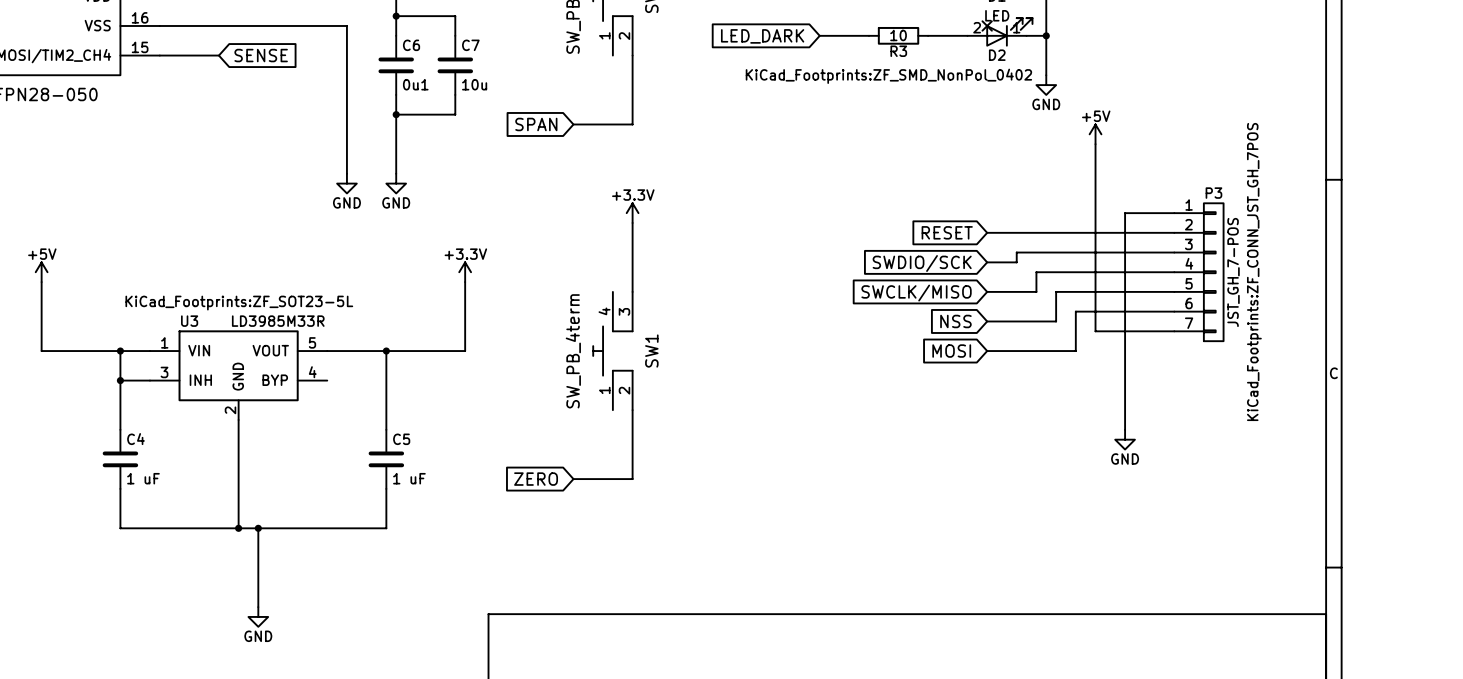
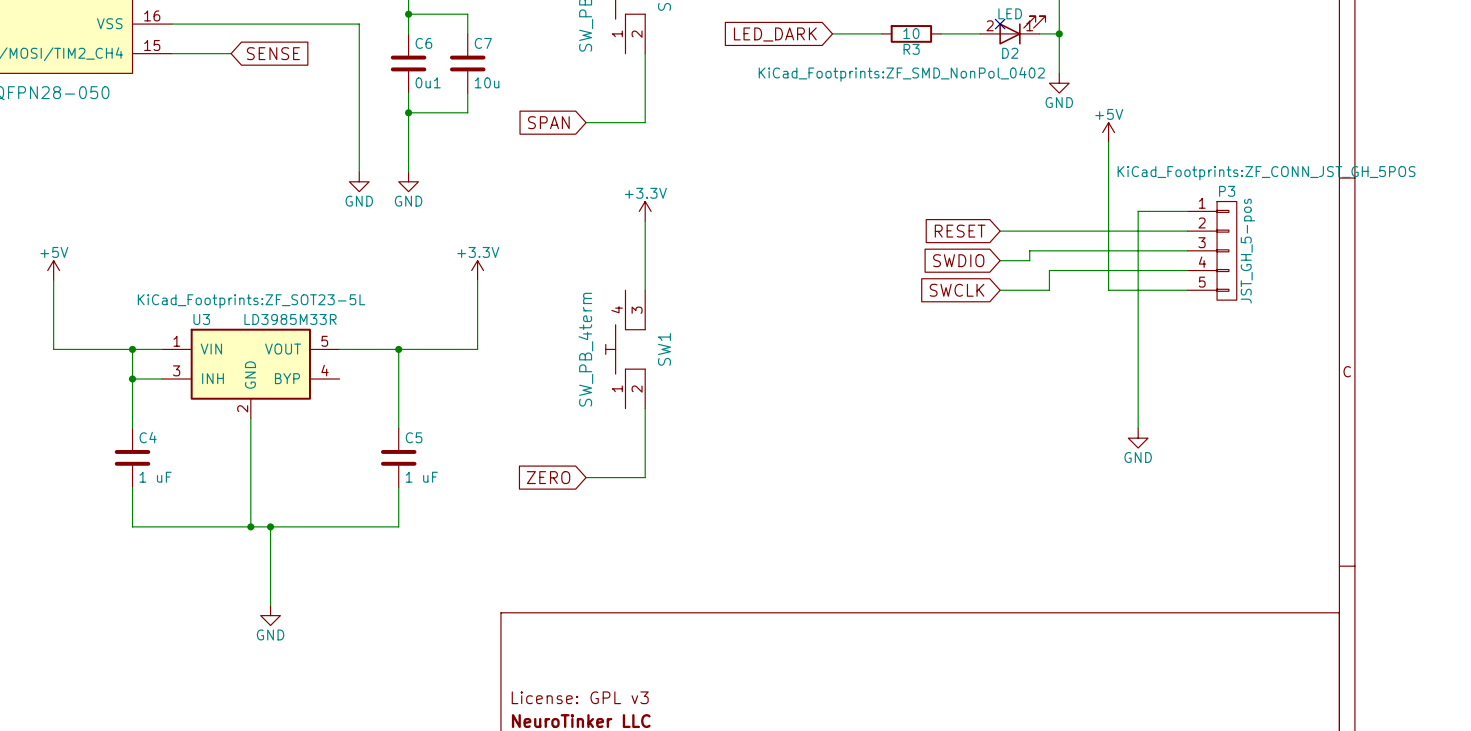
P3 symbol: [1174, 203, 1224, 342] -> [1187, 201, 1237, 301]
global label: SWDIO/SCK (922, 263) -> SWDIO (958, 260)
P3 value: JST_GH_7-POS (1233, 272) -> JST_GH_5-pos (1247, 251)
P3 text: KiCad_Footprints:ZF_CONN_JST_GH_7POS (1254, 272) -> KiCad_Footprints:ZF_CONN_JST_GH_5POS (1266, 173)
global label: SWCLK/MISO (916, 293) -> SWCLK (957, 290)
wire: (1174, 311) (1075, 311) (1075, 351) (987, 351) -> none
global label: NSS (955, 321) -> none
wire: (987, 321) (1056, 321) (1056, 291) (1095, 291) (1095, 331) (1174, 331) -> none
global label: MOSI (951, 351) -> none

